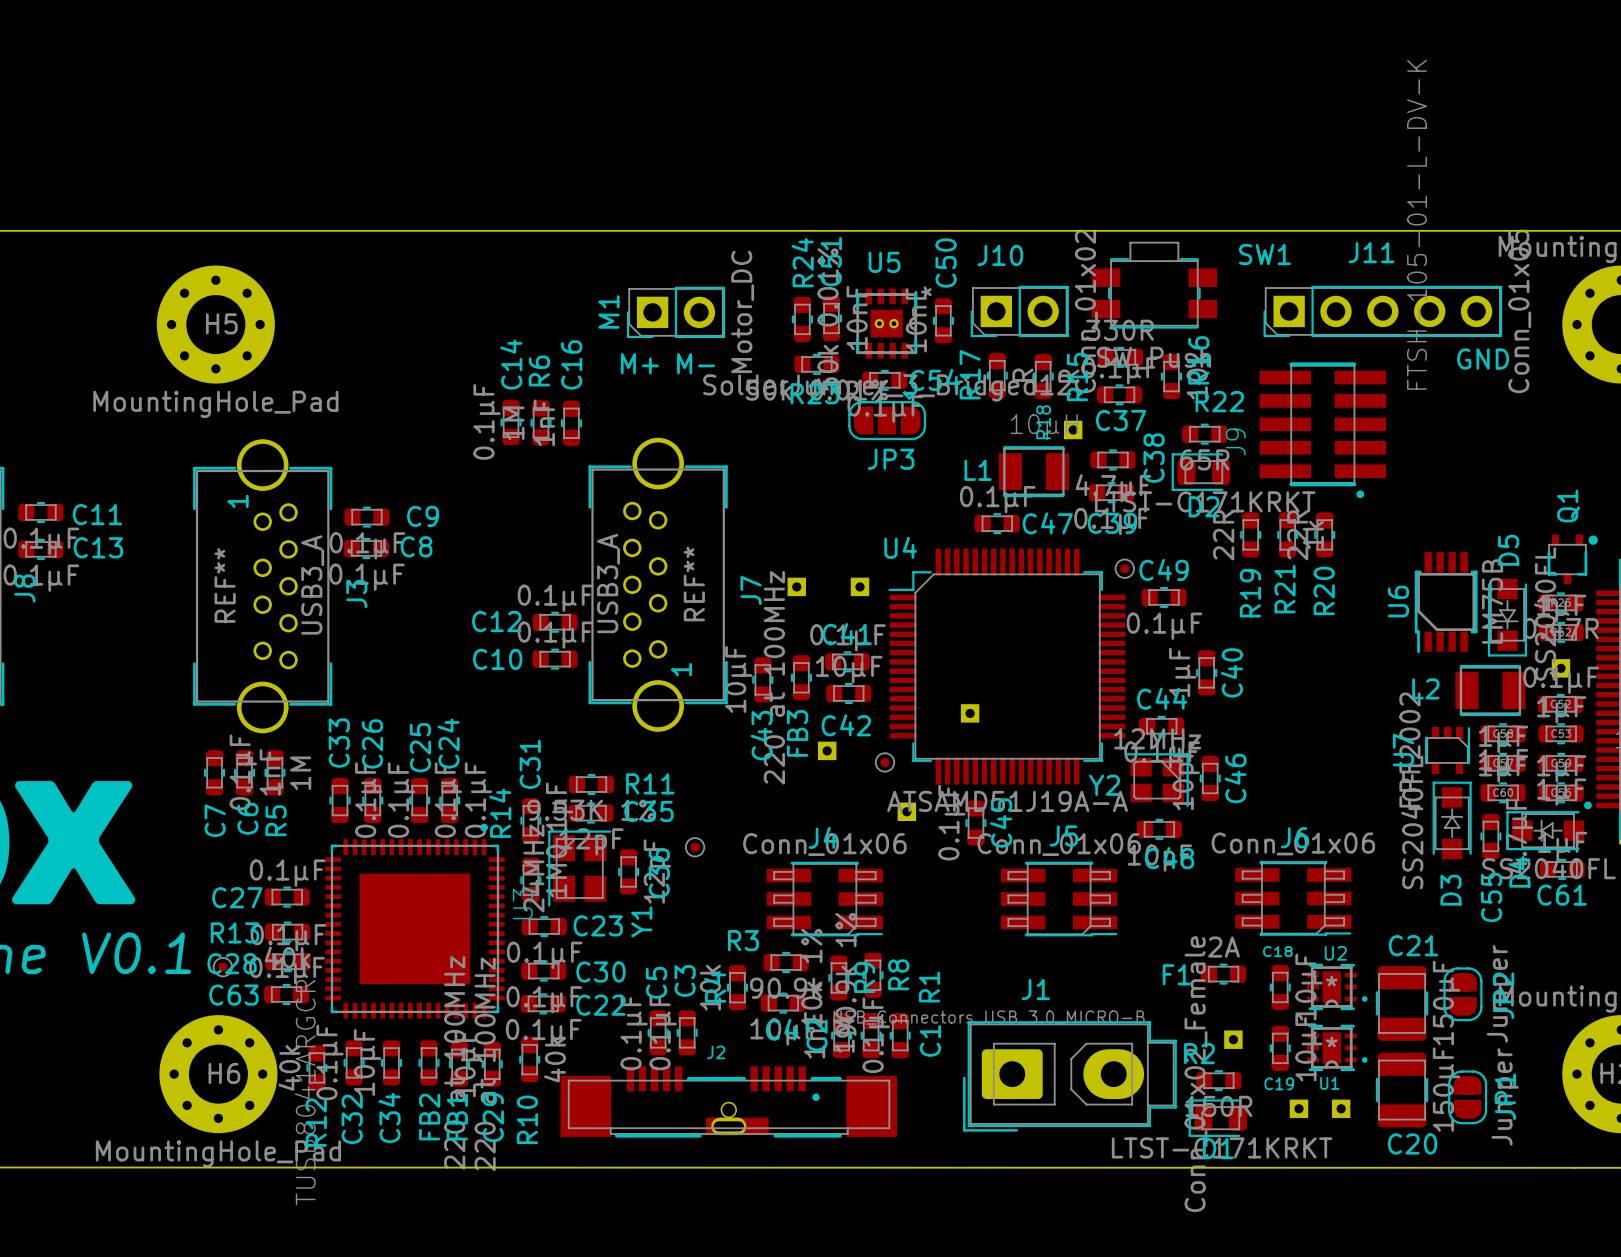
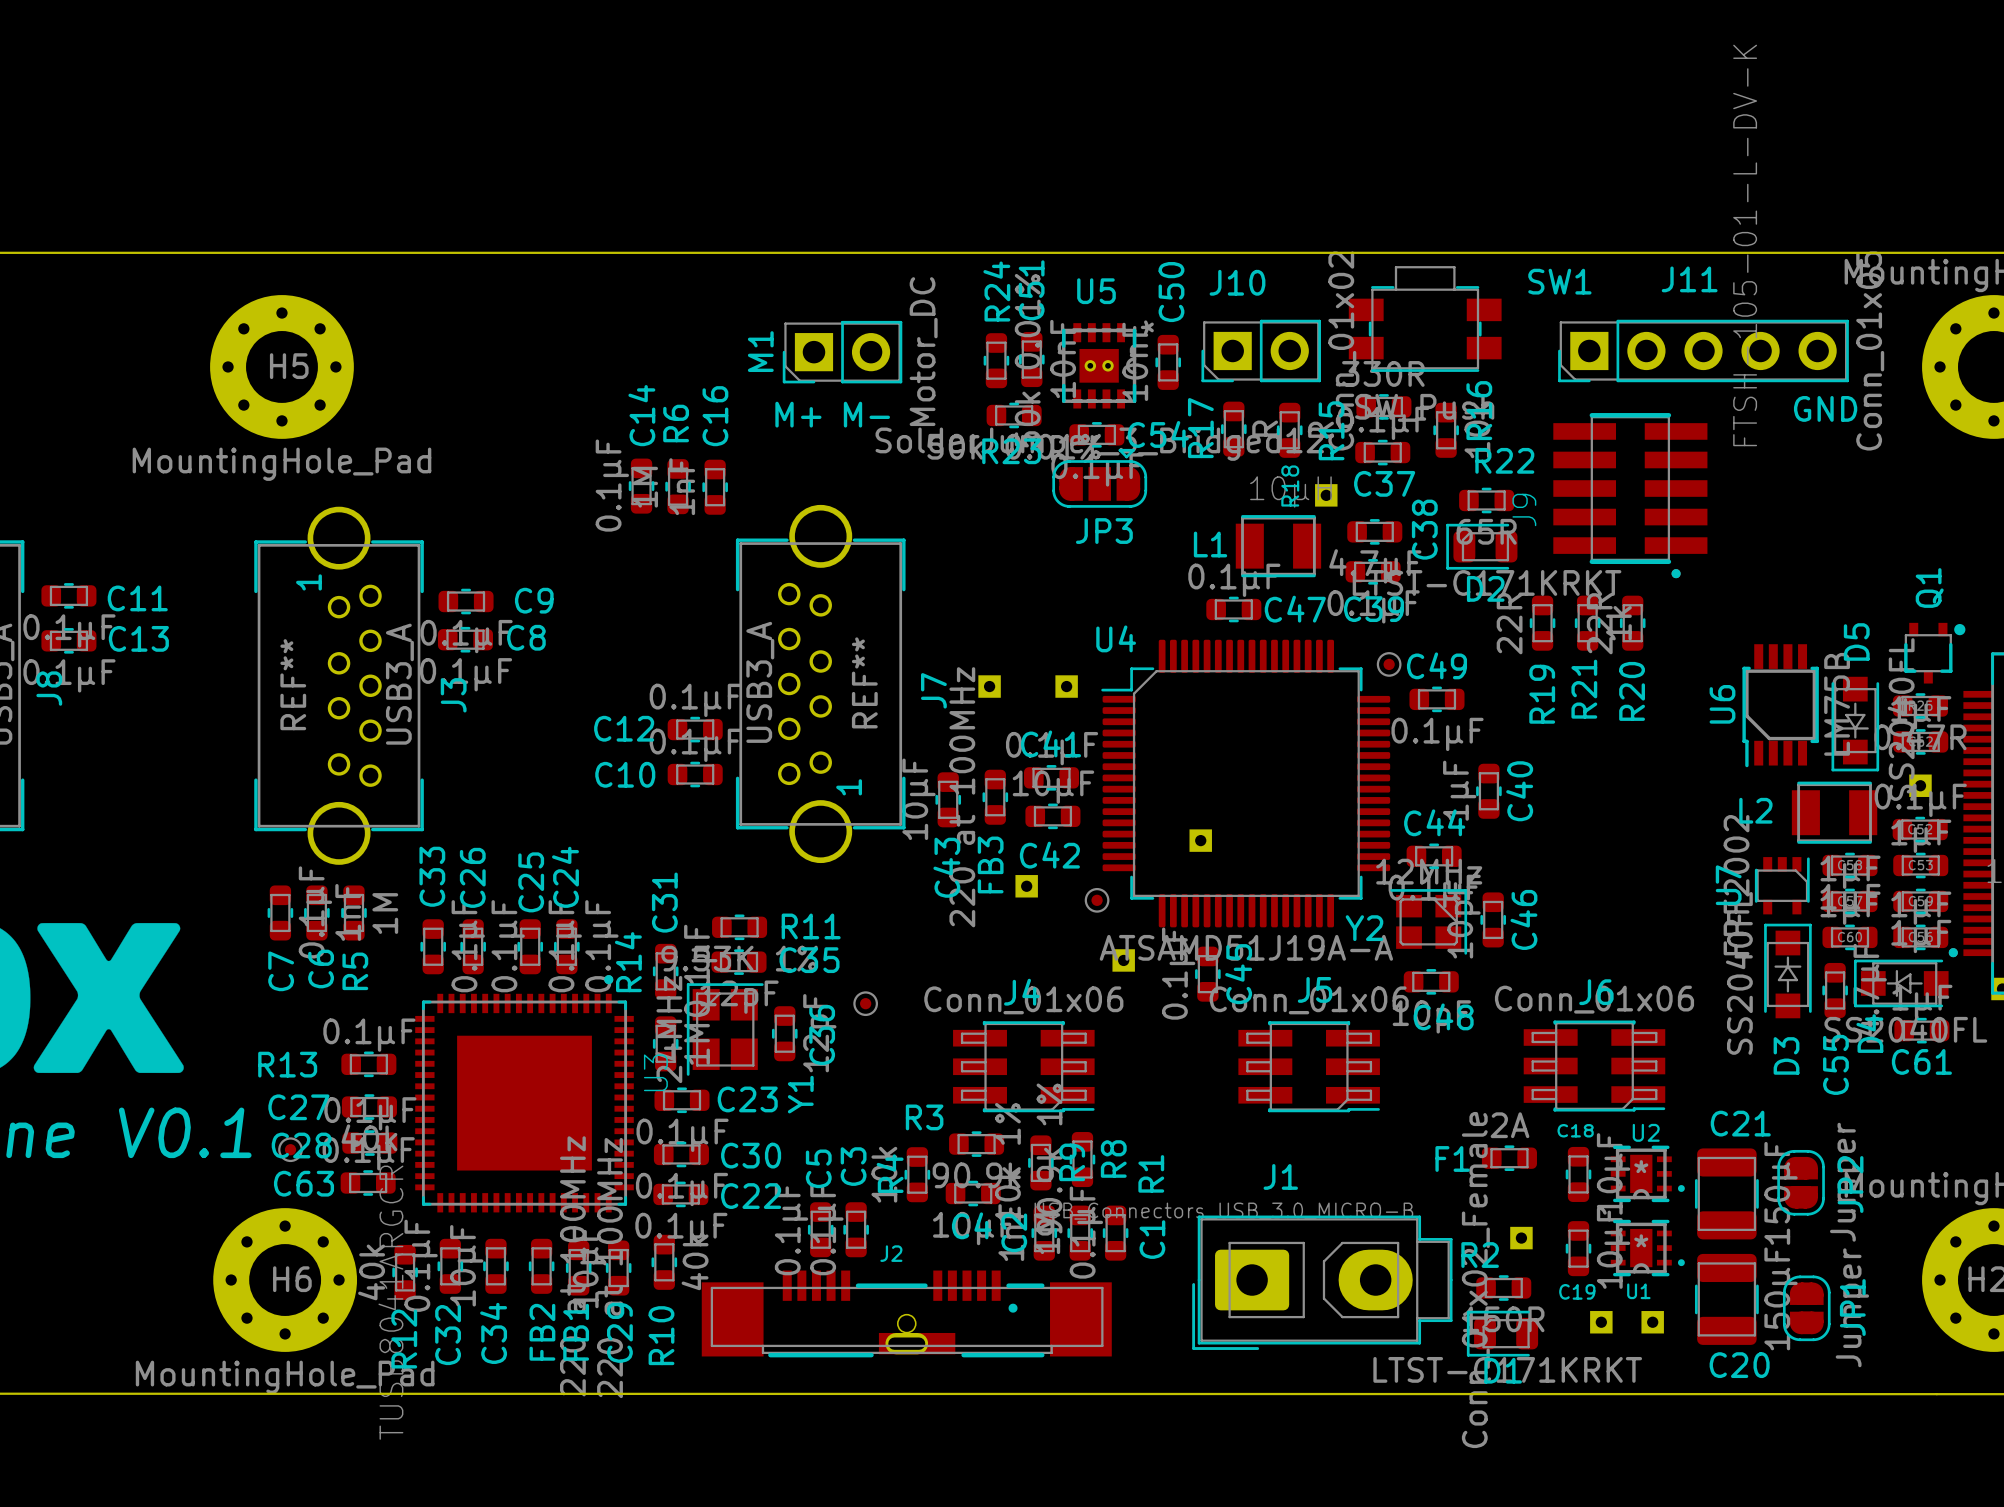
C27 name position: C27 (237, 897) -> C27 (298, 1107)
R13 name position: R13 (235, 932) -> R13 (287, 1064)

